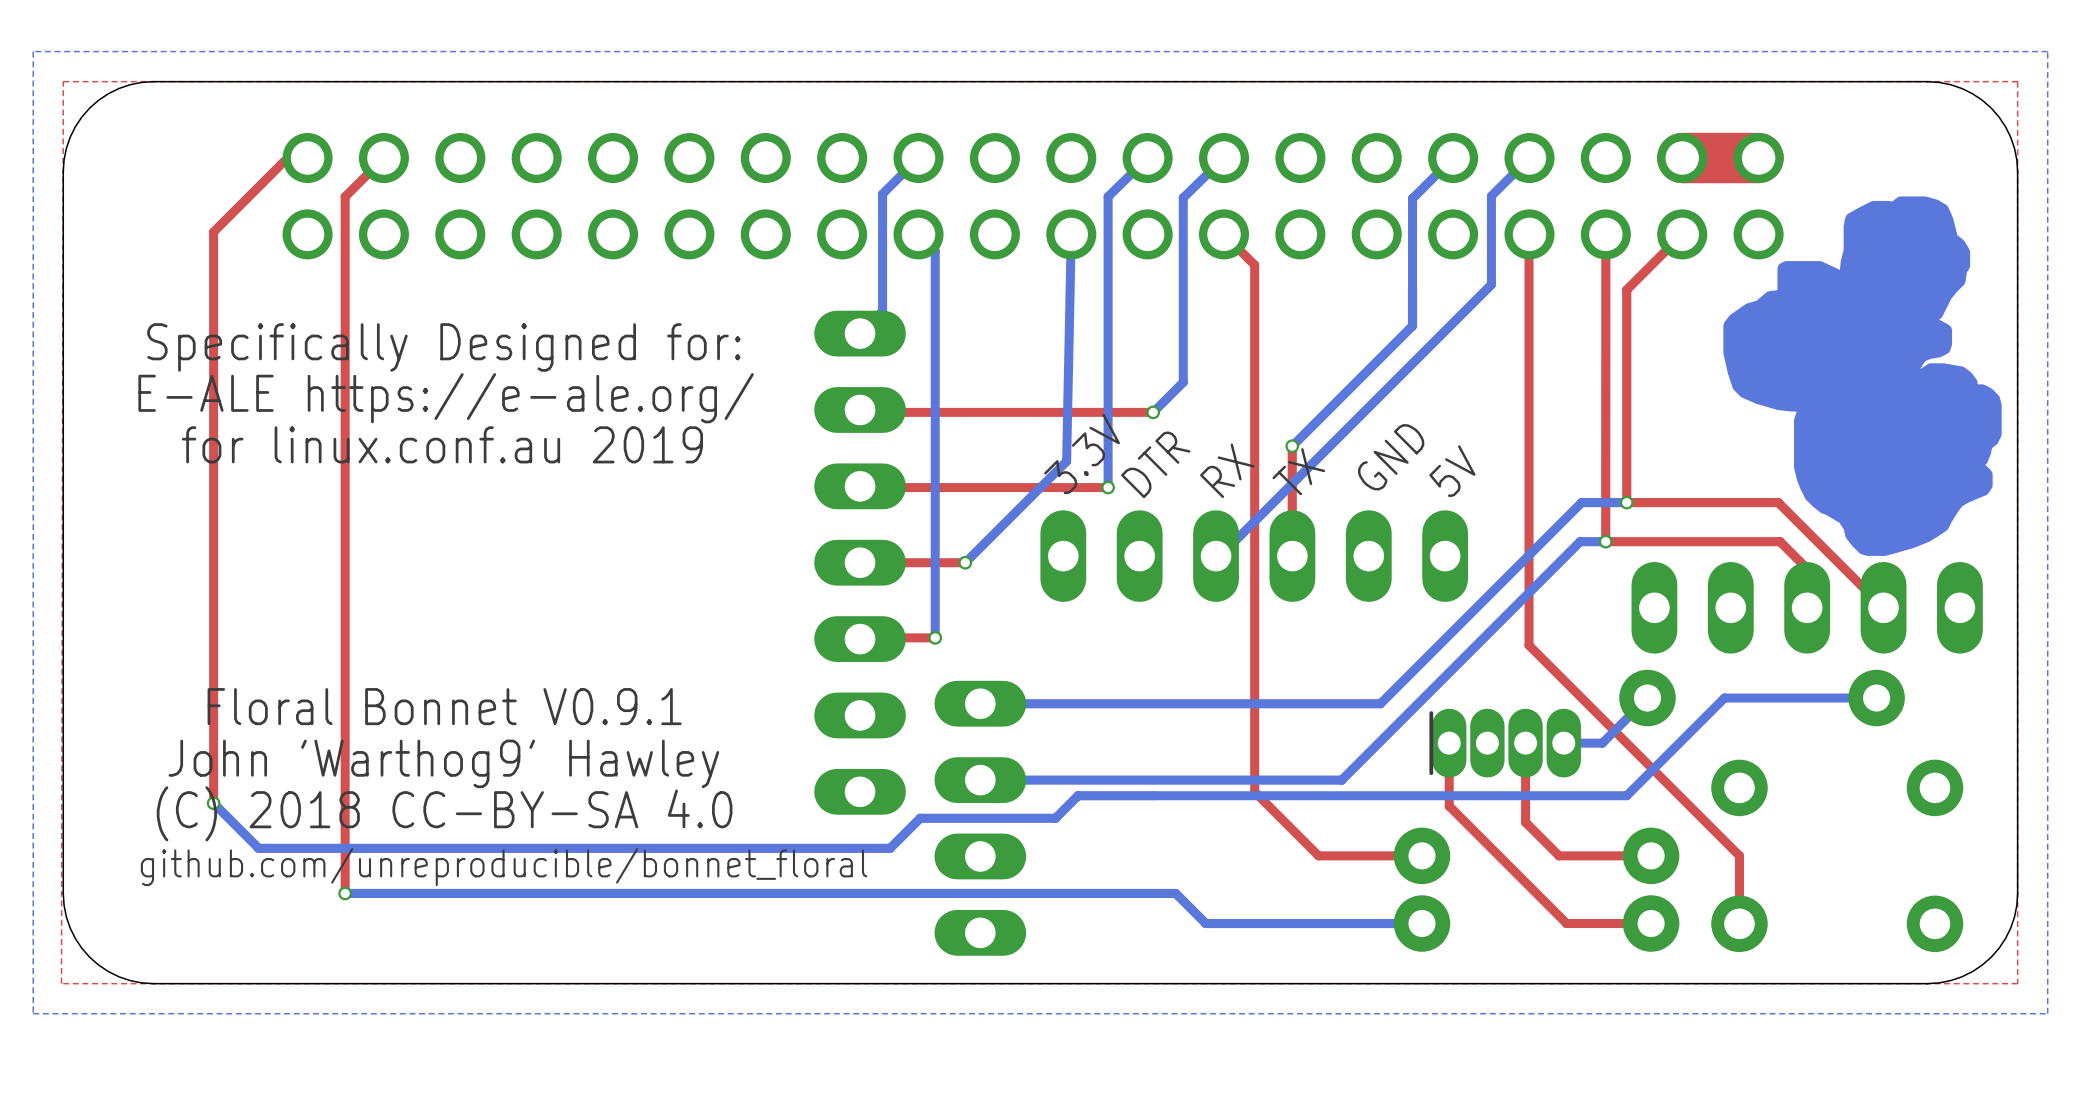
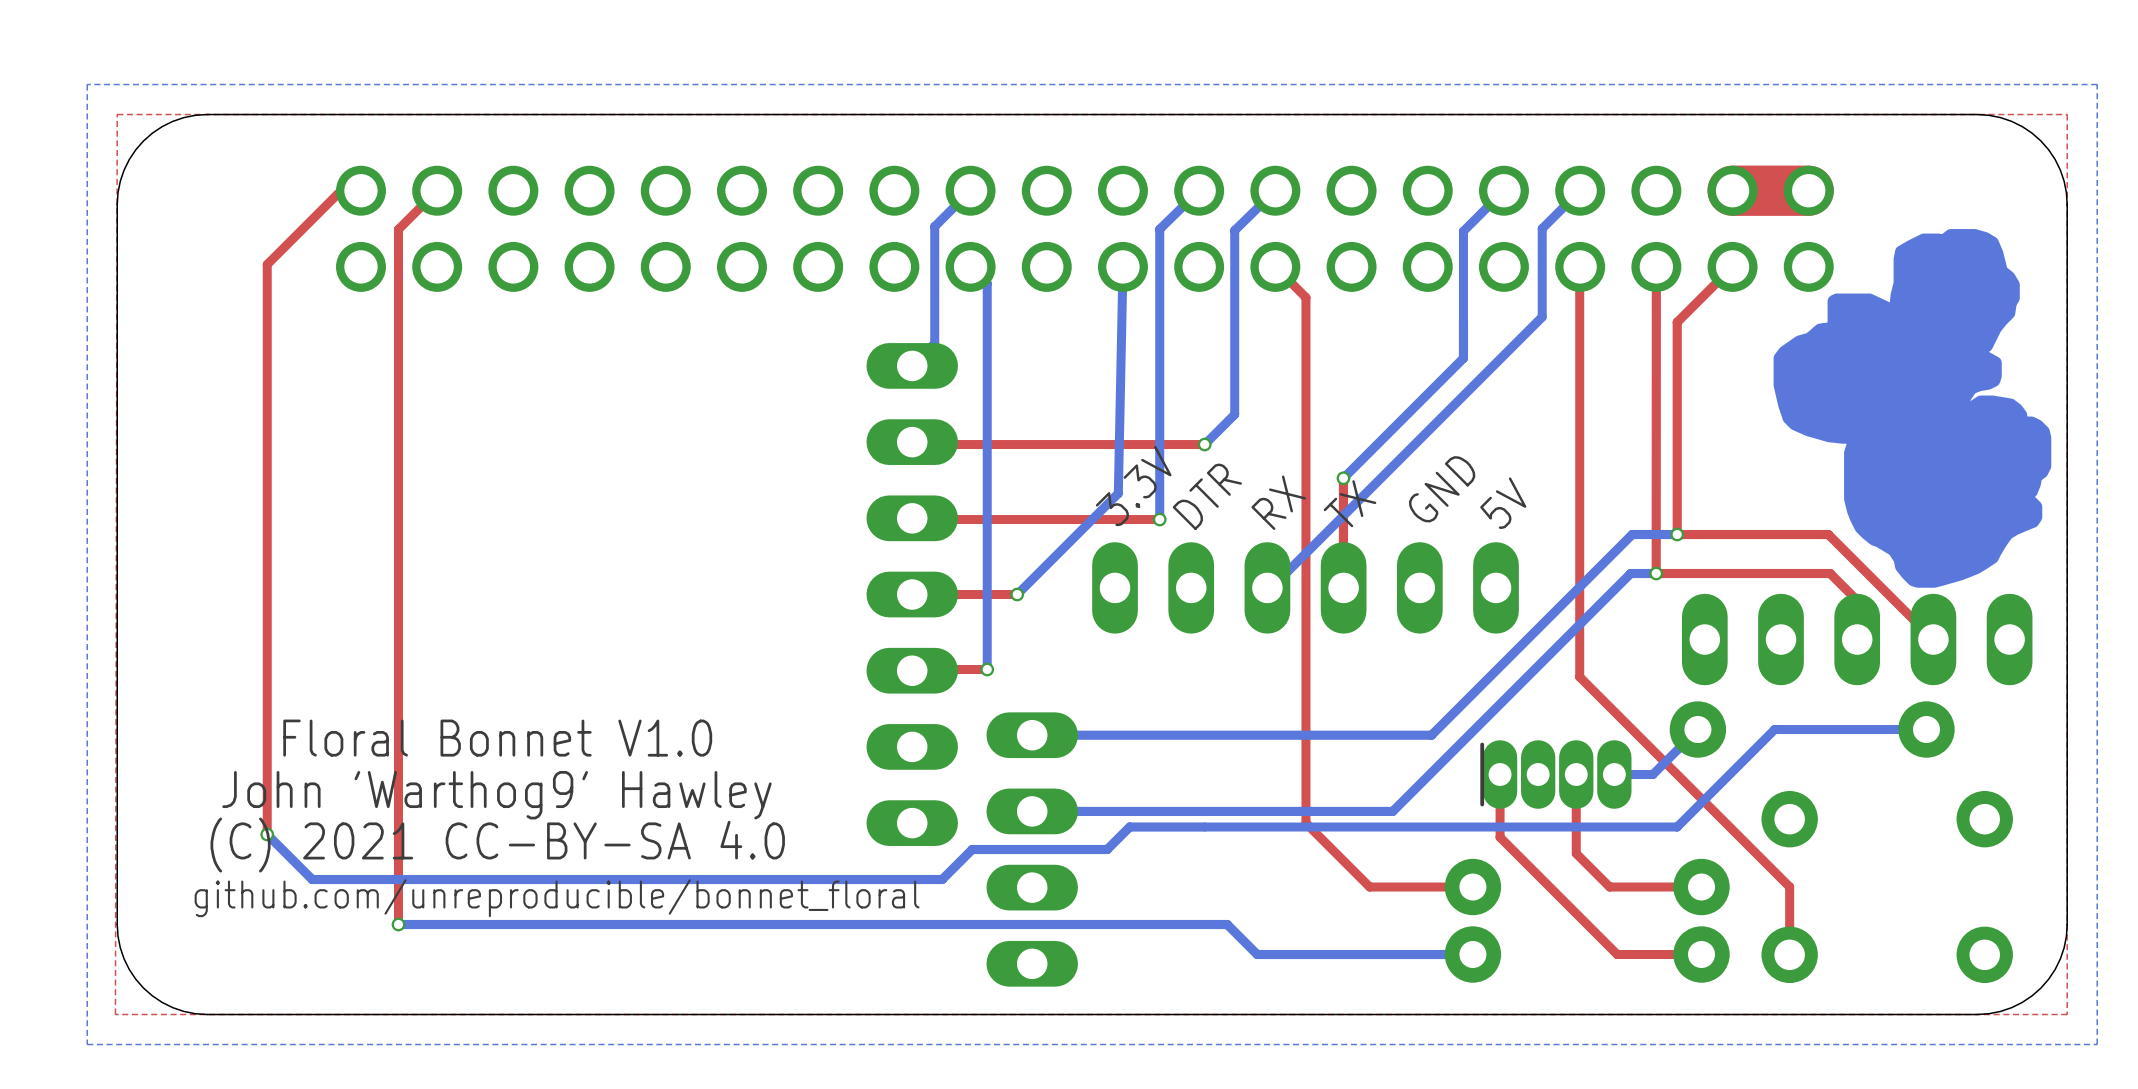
text: Specifically Designed for: (443, 347) -> none
text: E-ALE https://e-ale.org/ (446, 398) -> none
text: for linux.conf.au 2019 (442, 444) -> none
text: Floral Bonnet V0.9.1 (444, 706) -> Floral Bonnet V1.0 (497, 738)
text: (C) 2018 CC-BY-SA 4.0 (444, 813) -> (C) 2021 CC-BY-SA 4.0 (497, 845)

